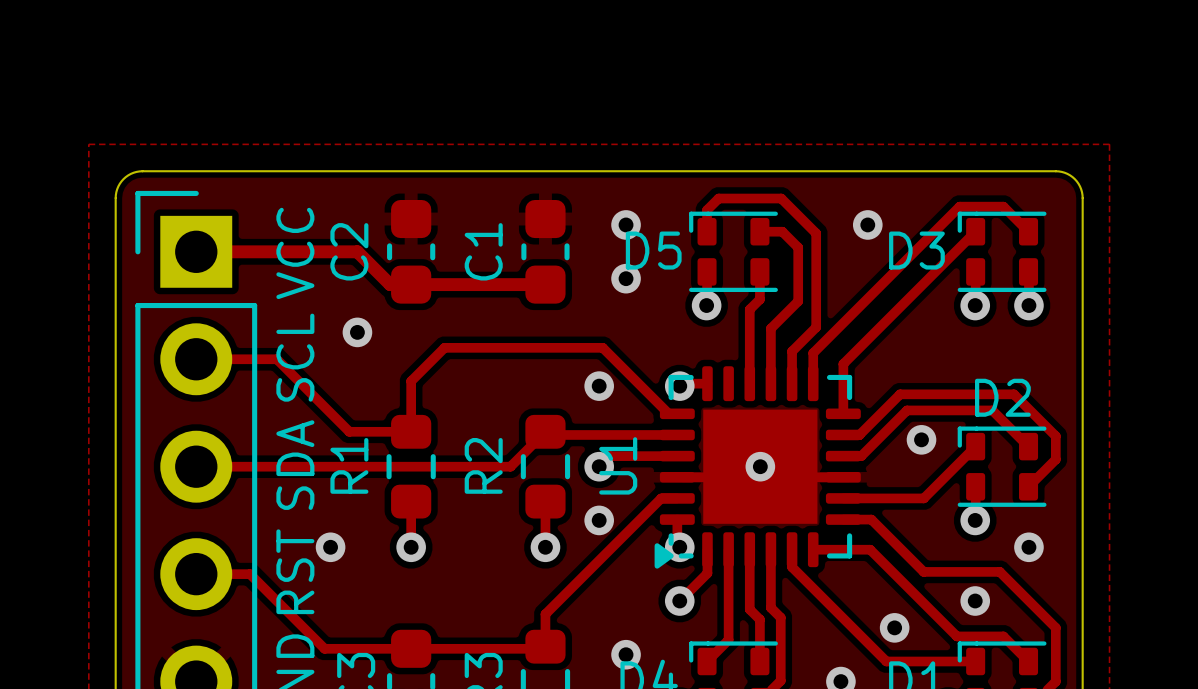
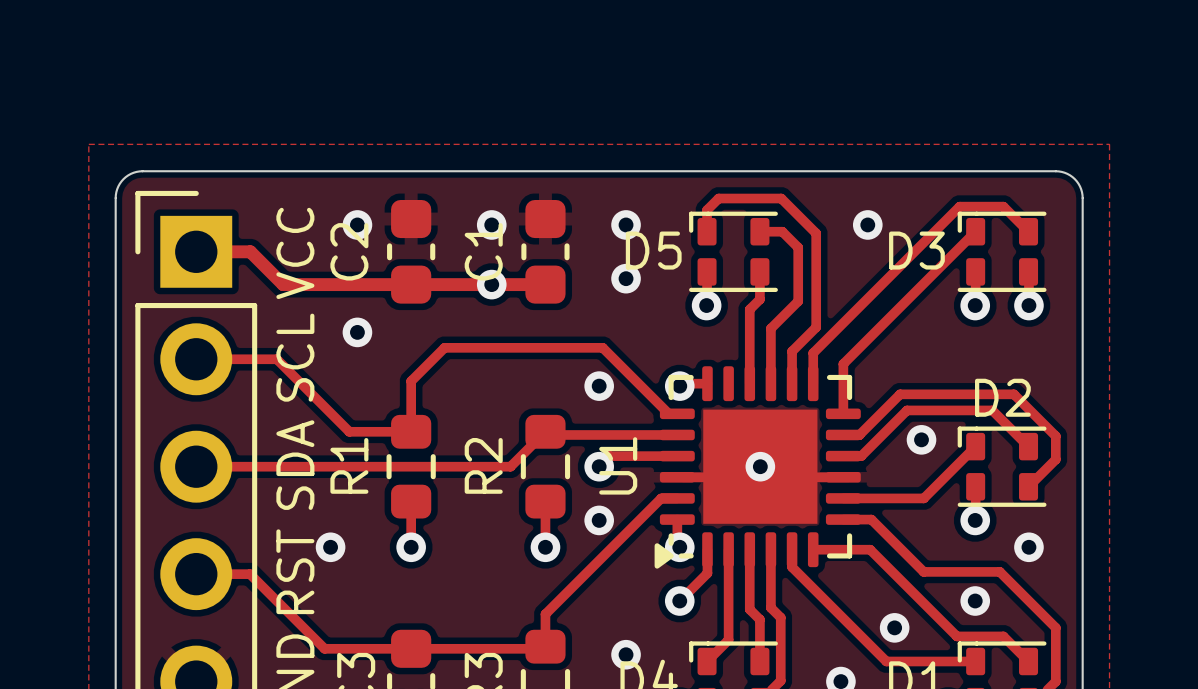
via: none -> (357, 224)
via: none -> (491, 224)
track: (250, 251) (357, 251) (390, 284) -> (250, 251) (283, 284) (390, 284)
via: none -> (491, 284)

